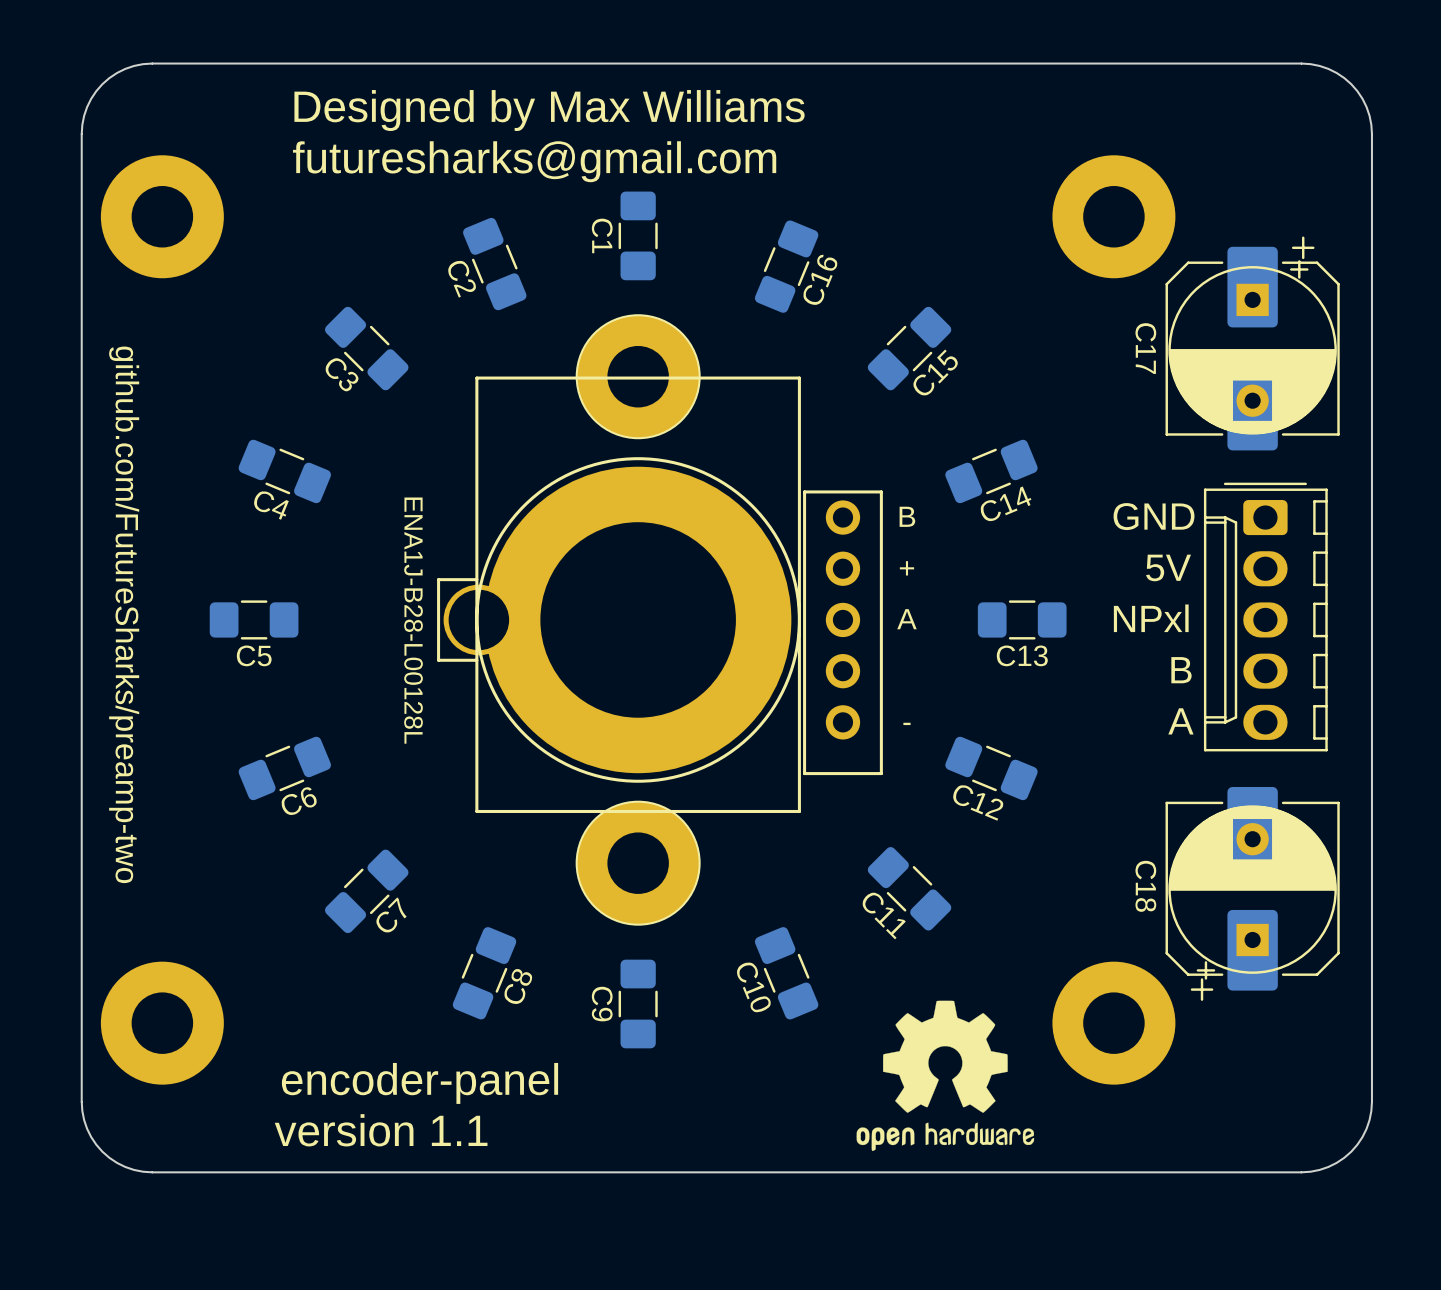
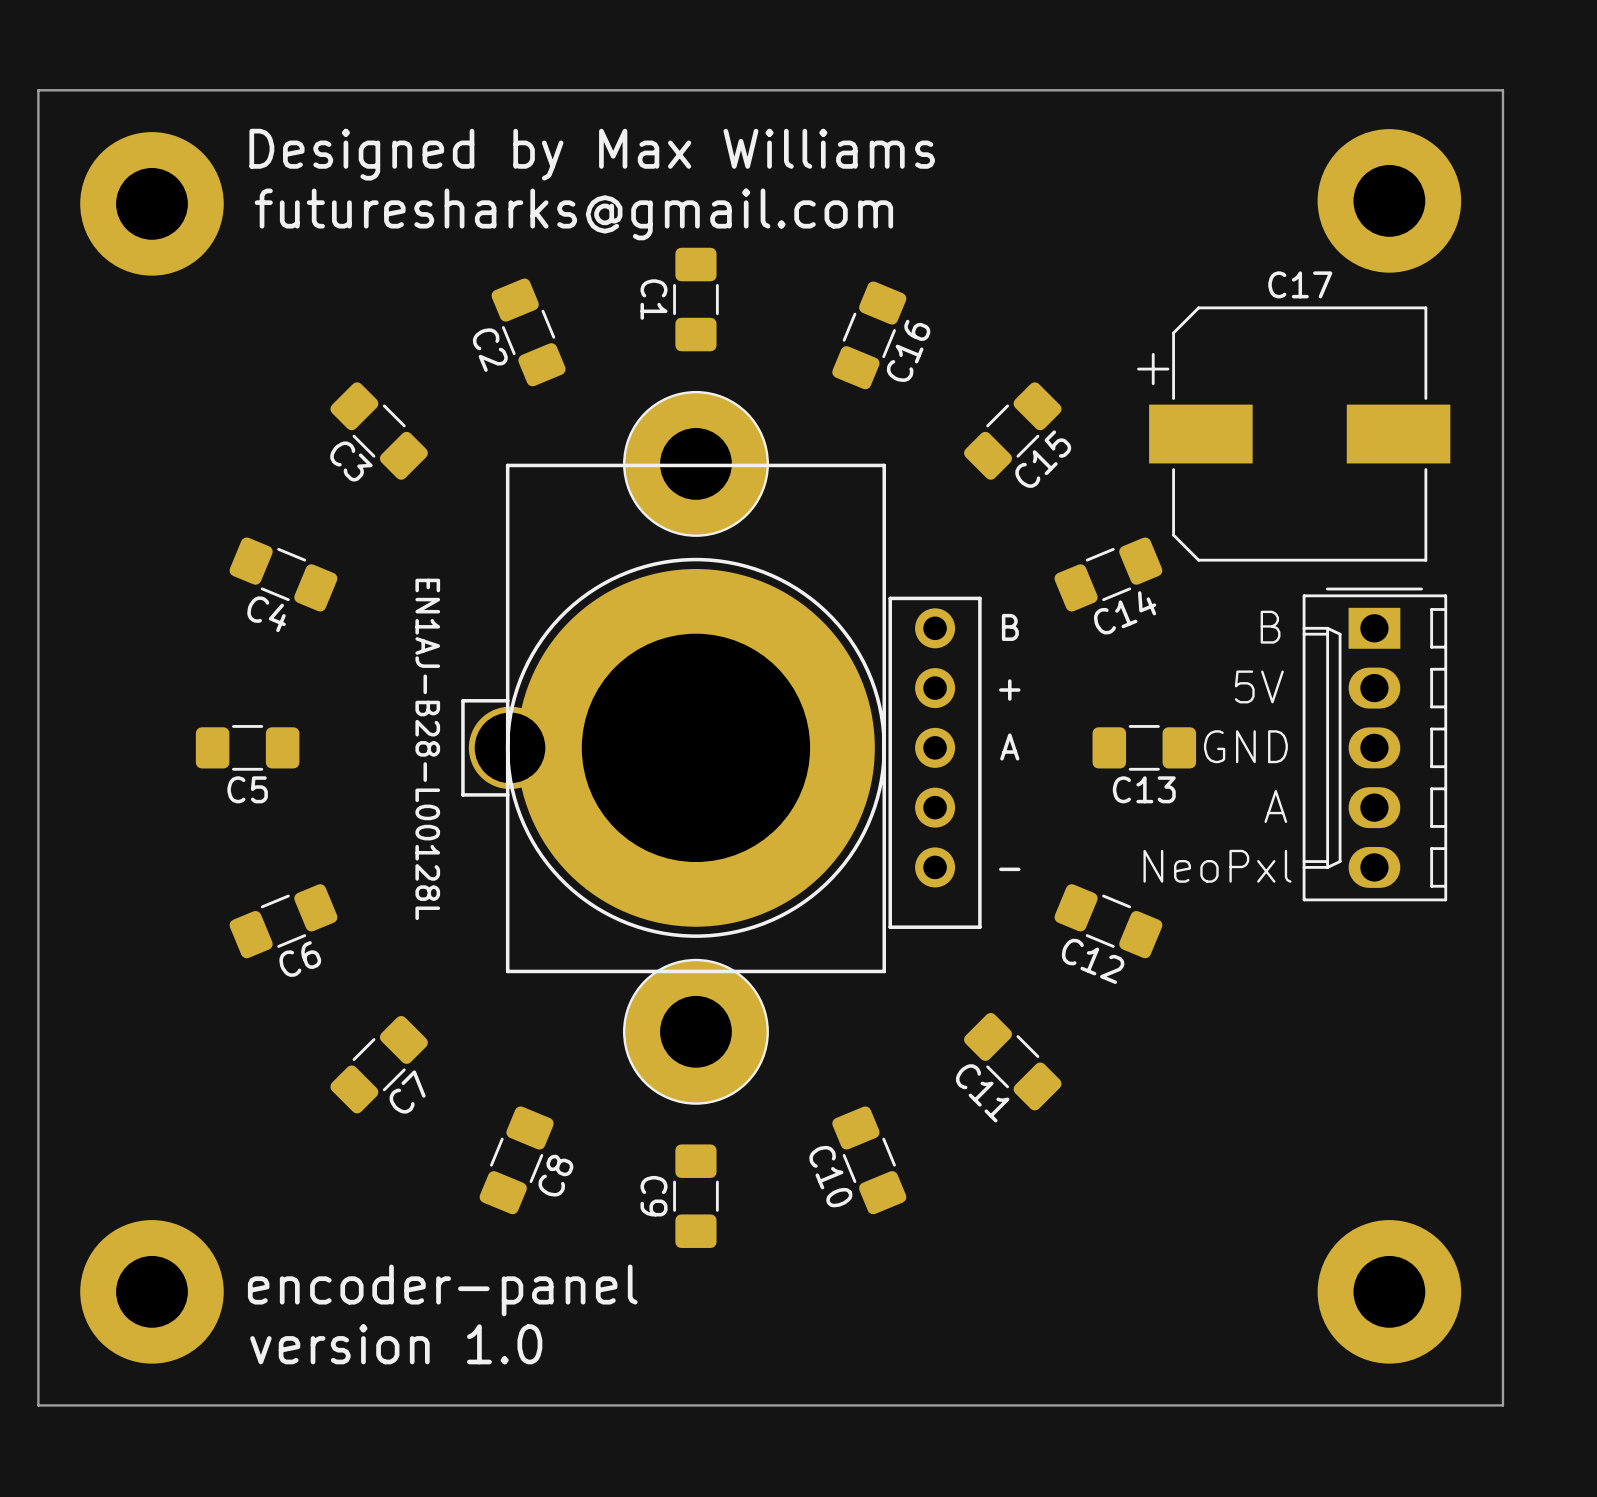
board edge: (1301, 63) (152, 63) (125, 68) (102, 84) (87, 107) (81, 134) (81, 1101) (87, 1128) (102, 1151) (125, 1166) (152, 1172) (1301, 1172) (1328, 1166) (1351, 1151) (1366, 1128) (1371, 1101) (1371, 134) (1366, 107) (1351, 84) (1328, 68) (1301, 63) -> (1502, 90) (1502, 1405) (38, 1405) (38, 90) (1502, 90)
part position: (162, 216) -> (151, 203)
part position: (1113, 216) -> (1389, 200)
C17 footprint: [1165, 236, 1340, 451] -> [1137, 306, 1451, 562]
part: (1252, 347) -> none
C17 name position: C17 (1145, 348) -> C17 (1300, 284)
text position: GND (1154, 516) -> GND (1245, 746)
text position: 5V (1168, 567) -> 5V (1259, 686)
text: github.com/FutureSharks/preamp-two (124, 614) -> none
part: none -> (1374, 744)
part: (1265, 617) -> none
text: NPxl (1151, 618) -> none
part text: none -> EN1AJ-B28-L00128L (427, 749)
part text: ENA1J-B28-L00128L (413, 620) -> none
text position: B (1181, 670) -> B (1270, 627)
text: none -> NeoPxl (1217, 866)
text position: A (1180, 721) -> A (1275, 806)
part: (1252, 892) -> none
C18: (1252, 893) -> none
drawing: [856, 1000, 1035, 1152] -> none
part position: (162, 1023) -> (151, 1291)
part position: (1113, 1023) -> (1389, 1291)
text: version 1.1 (381, 1130) -> version 1.0 (396, 1344)

